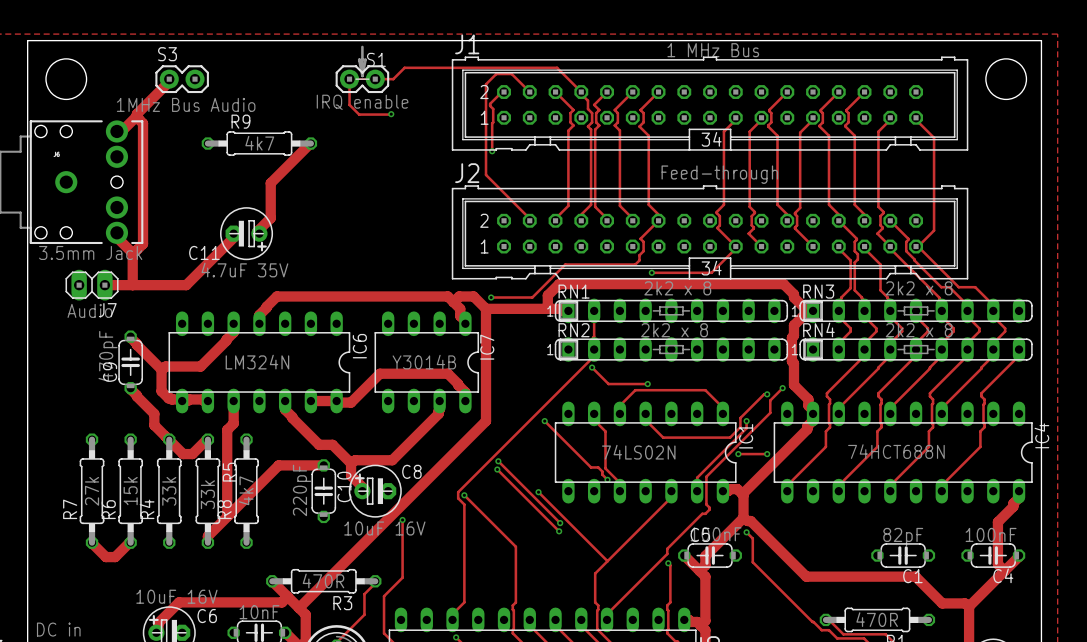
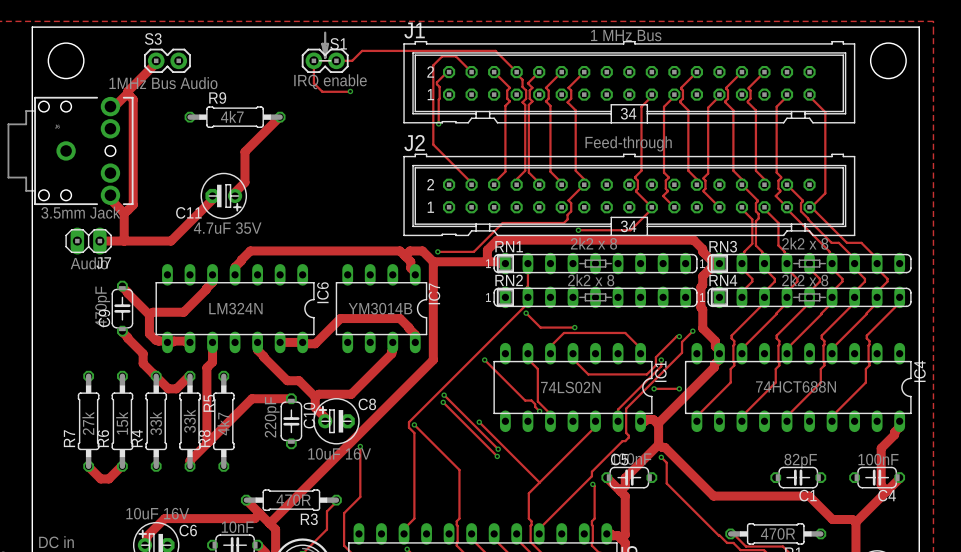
IC7 text: none -> YM3014B (380, 308)
text: Y3014B (424, 362) -> none

